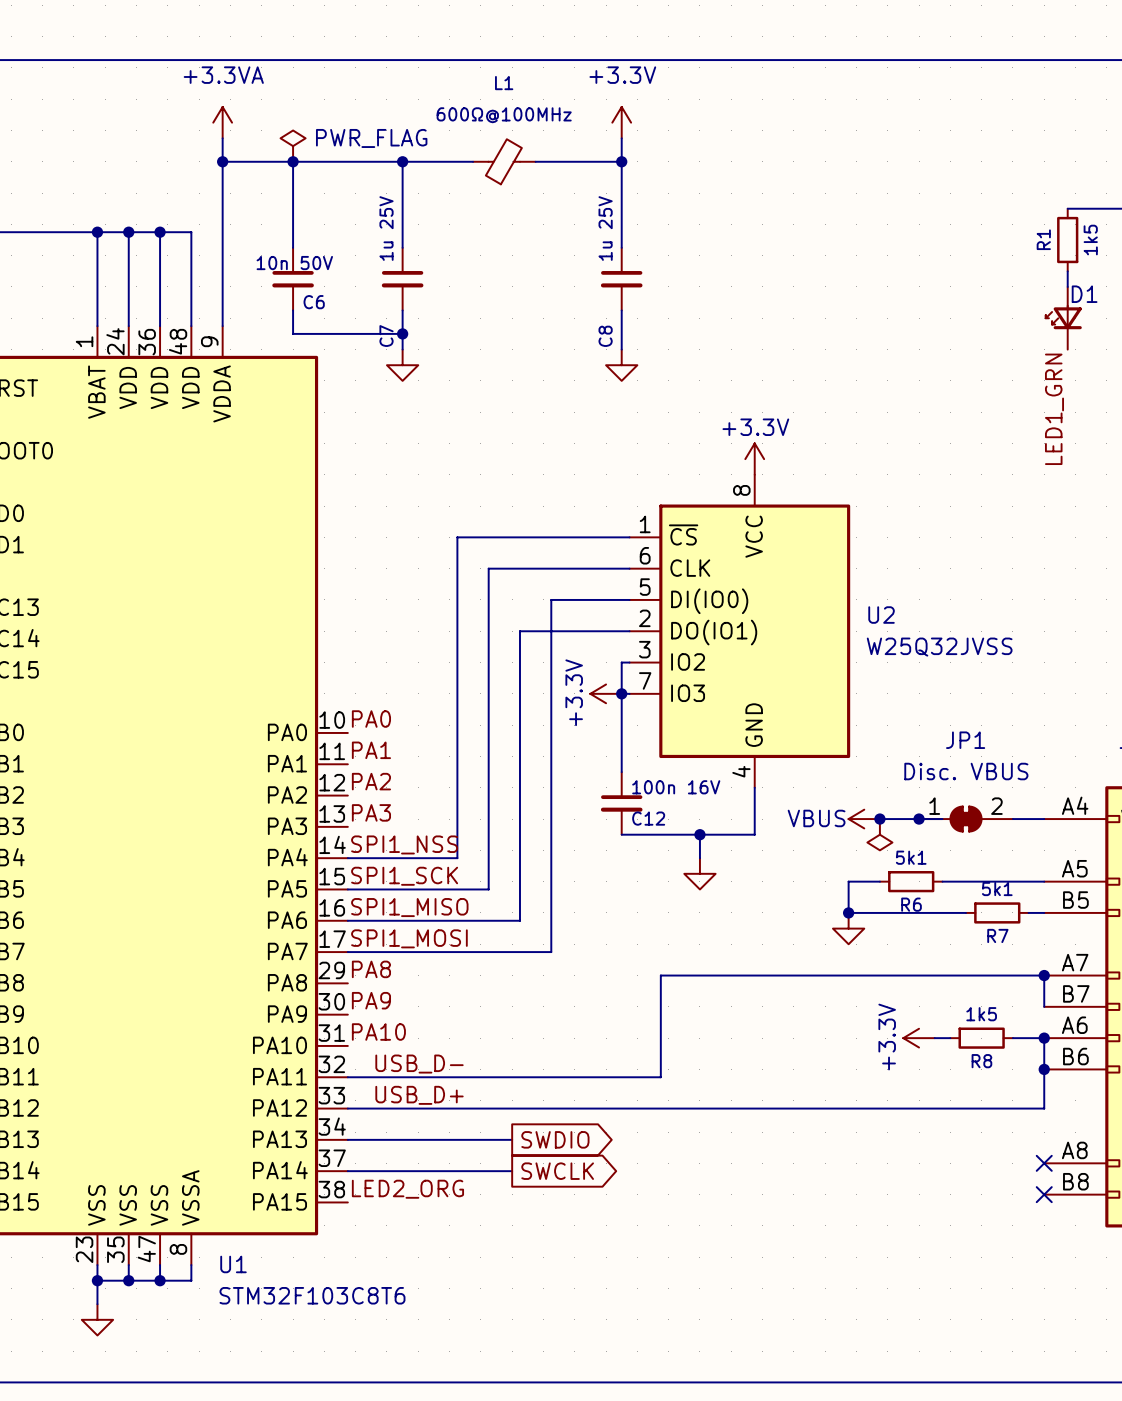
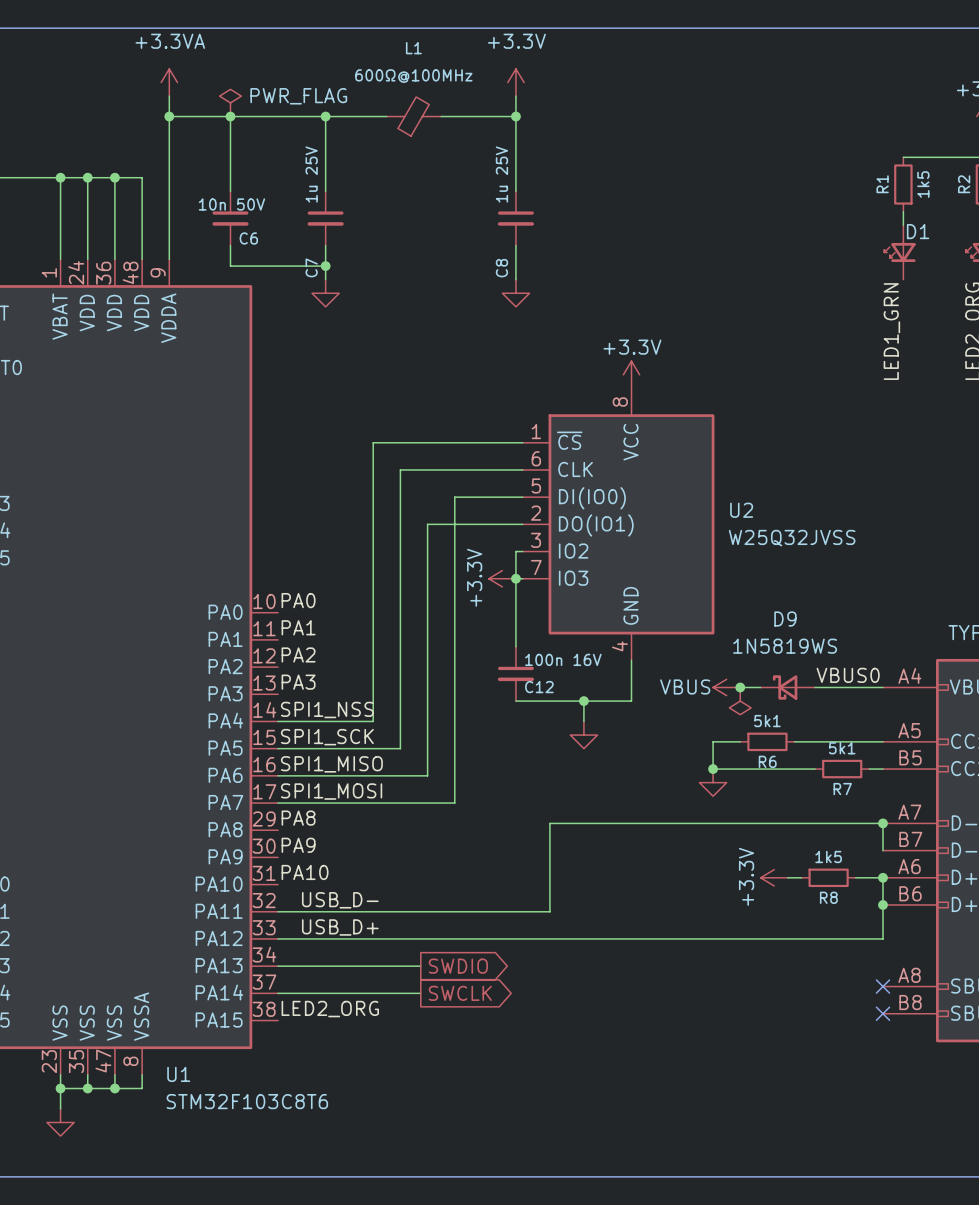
label: none -> VBUS0 (848, 675)
junction: (919, 819) -> none
D9: none -> 1N5819WS (787, 687)
JP1: Disc. VBUS (965, 819) -> none

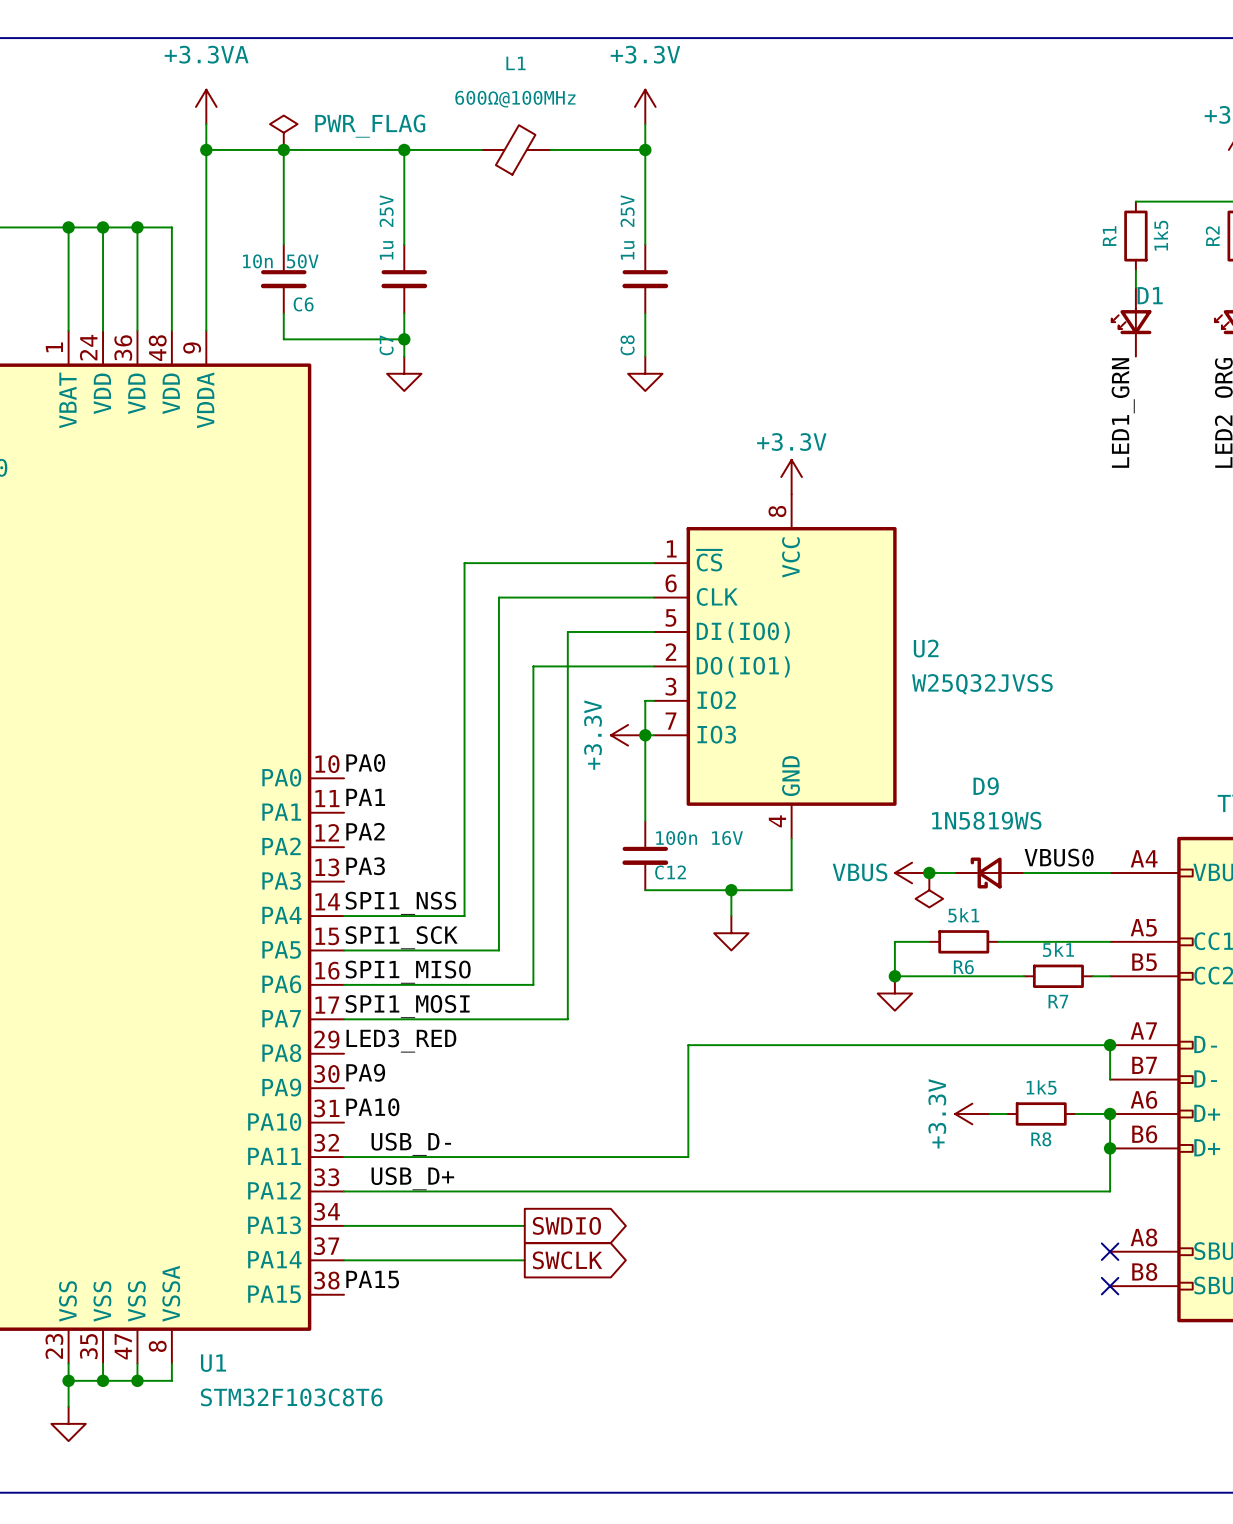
label: PA8 (298, 818) -> LED3_RED (401, 1041)
label: LED2_ORG (330, 1009) -> PA15 (372, 1279)

